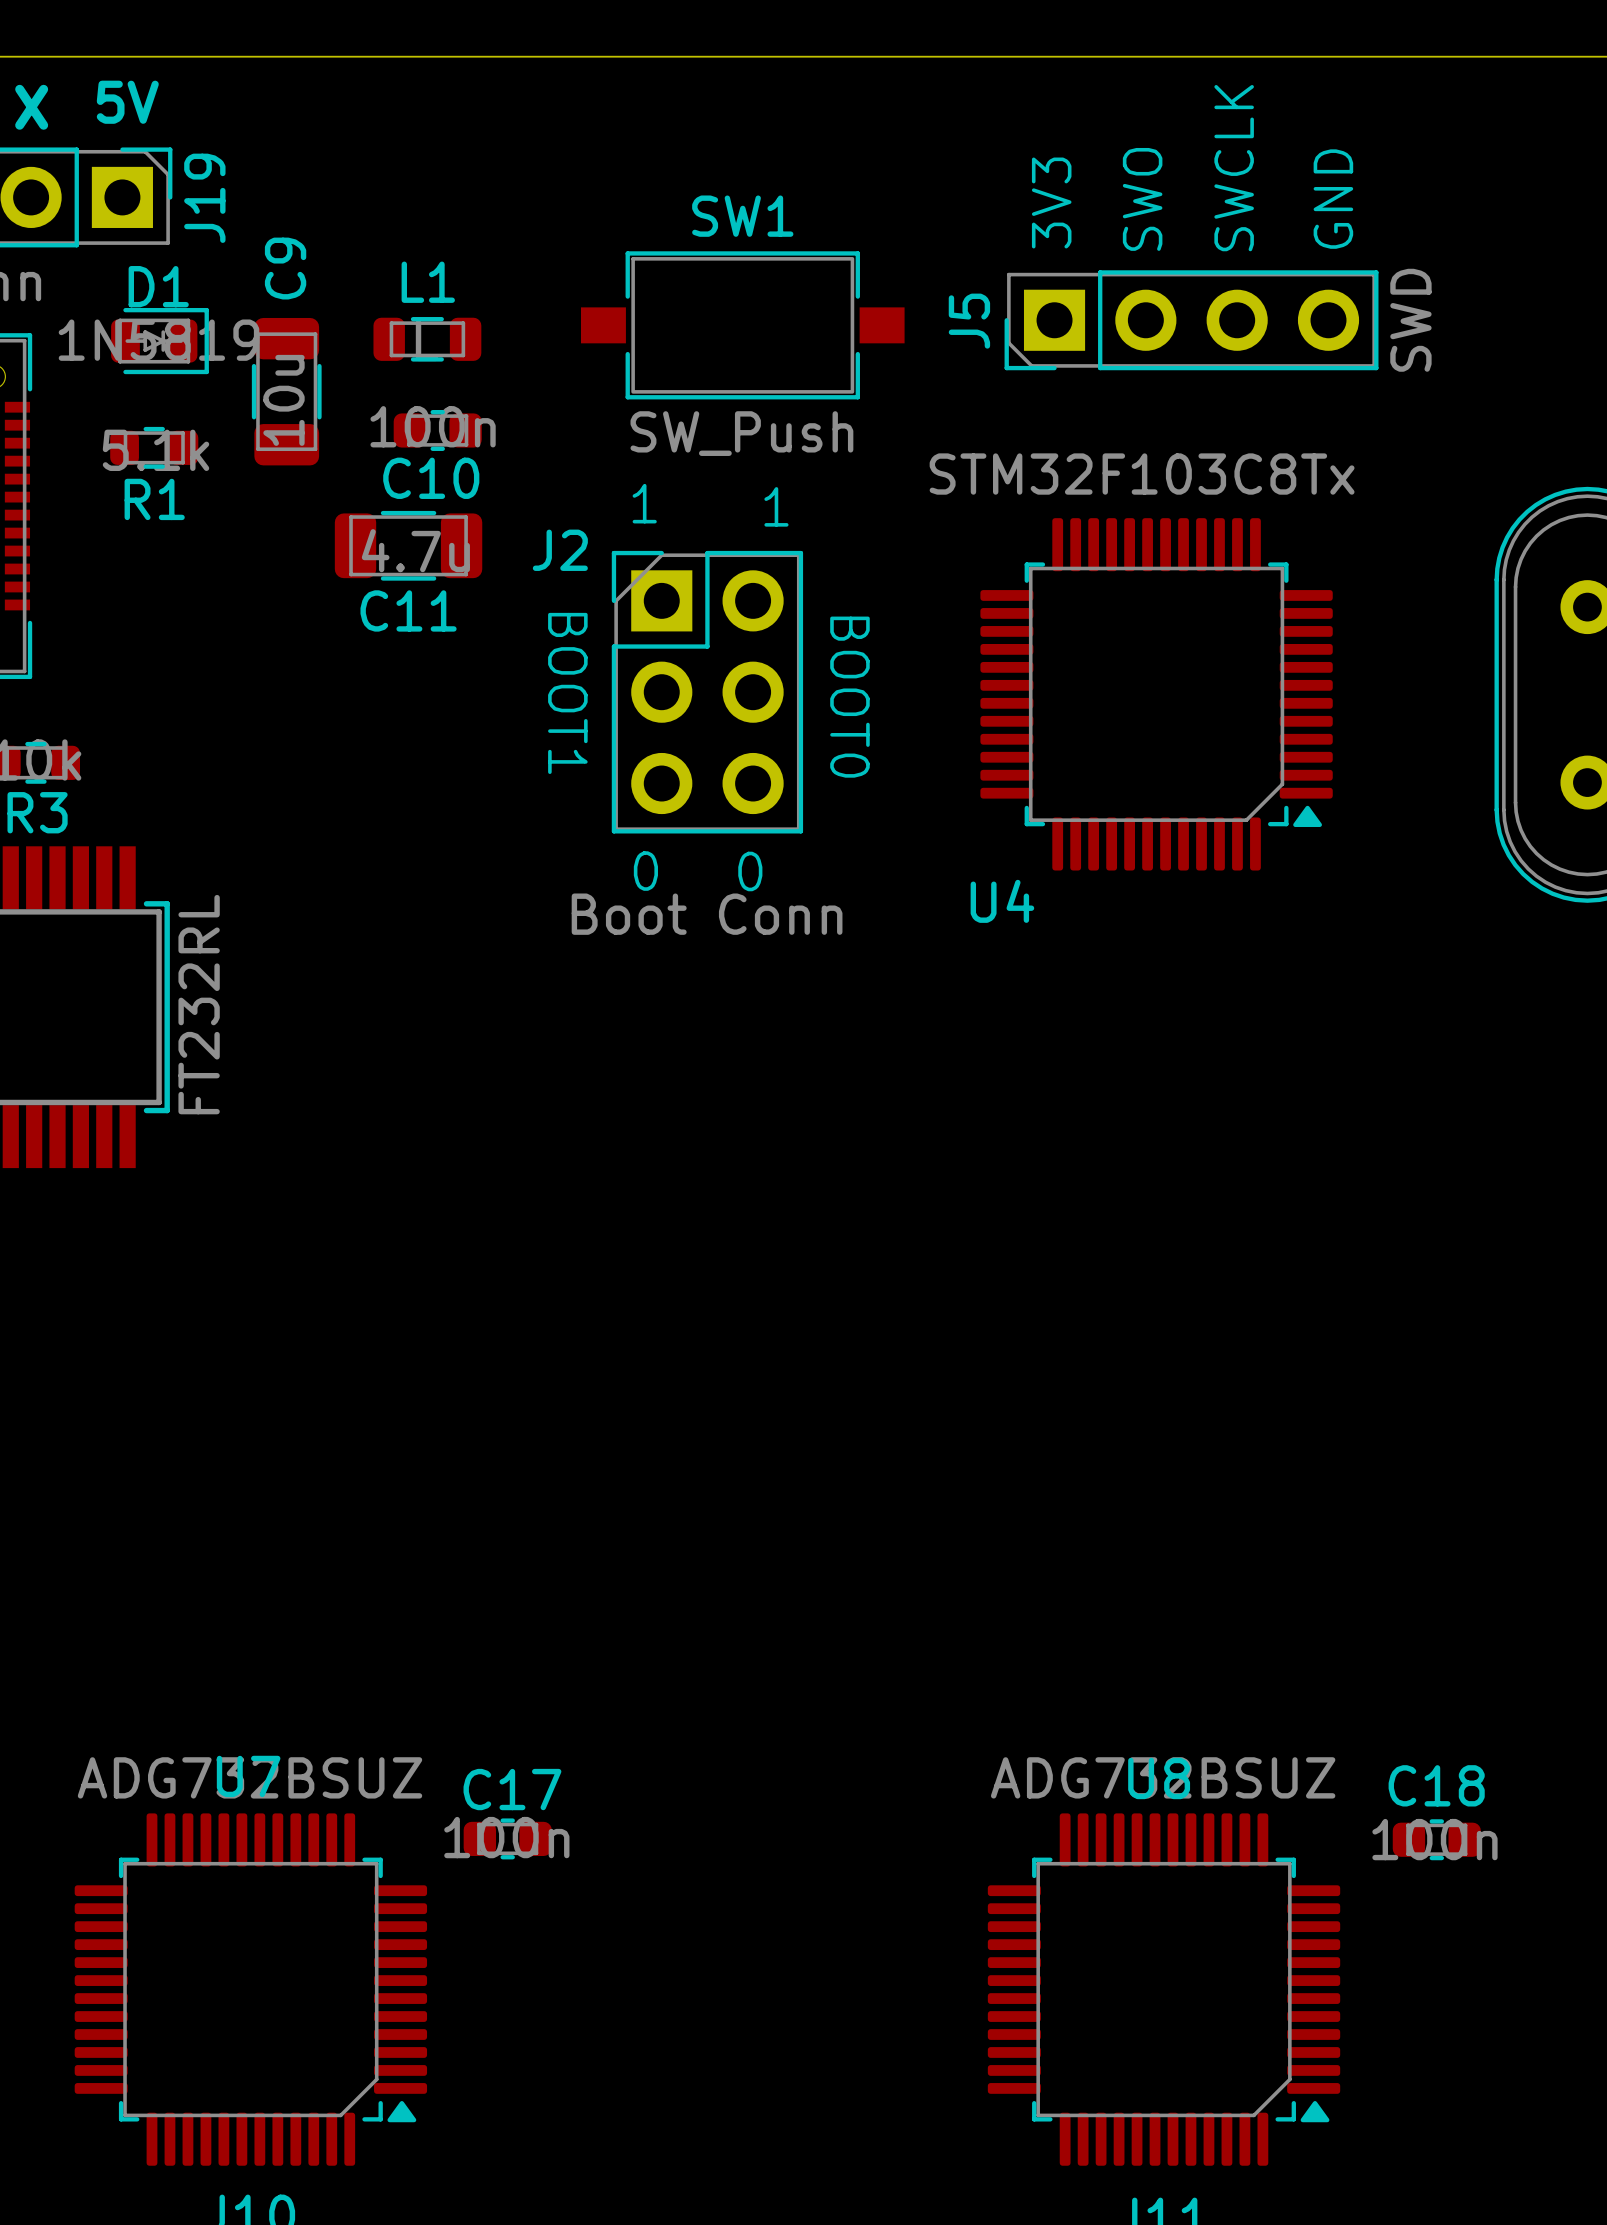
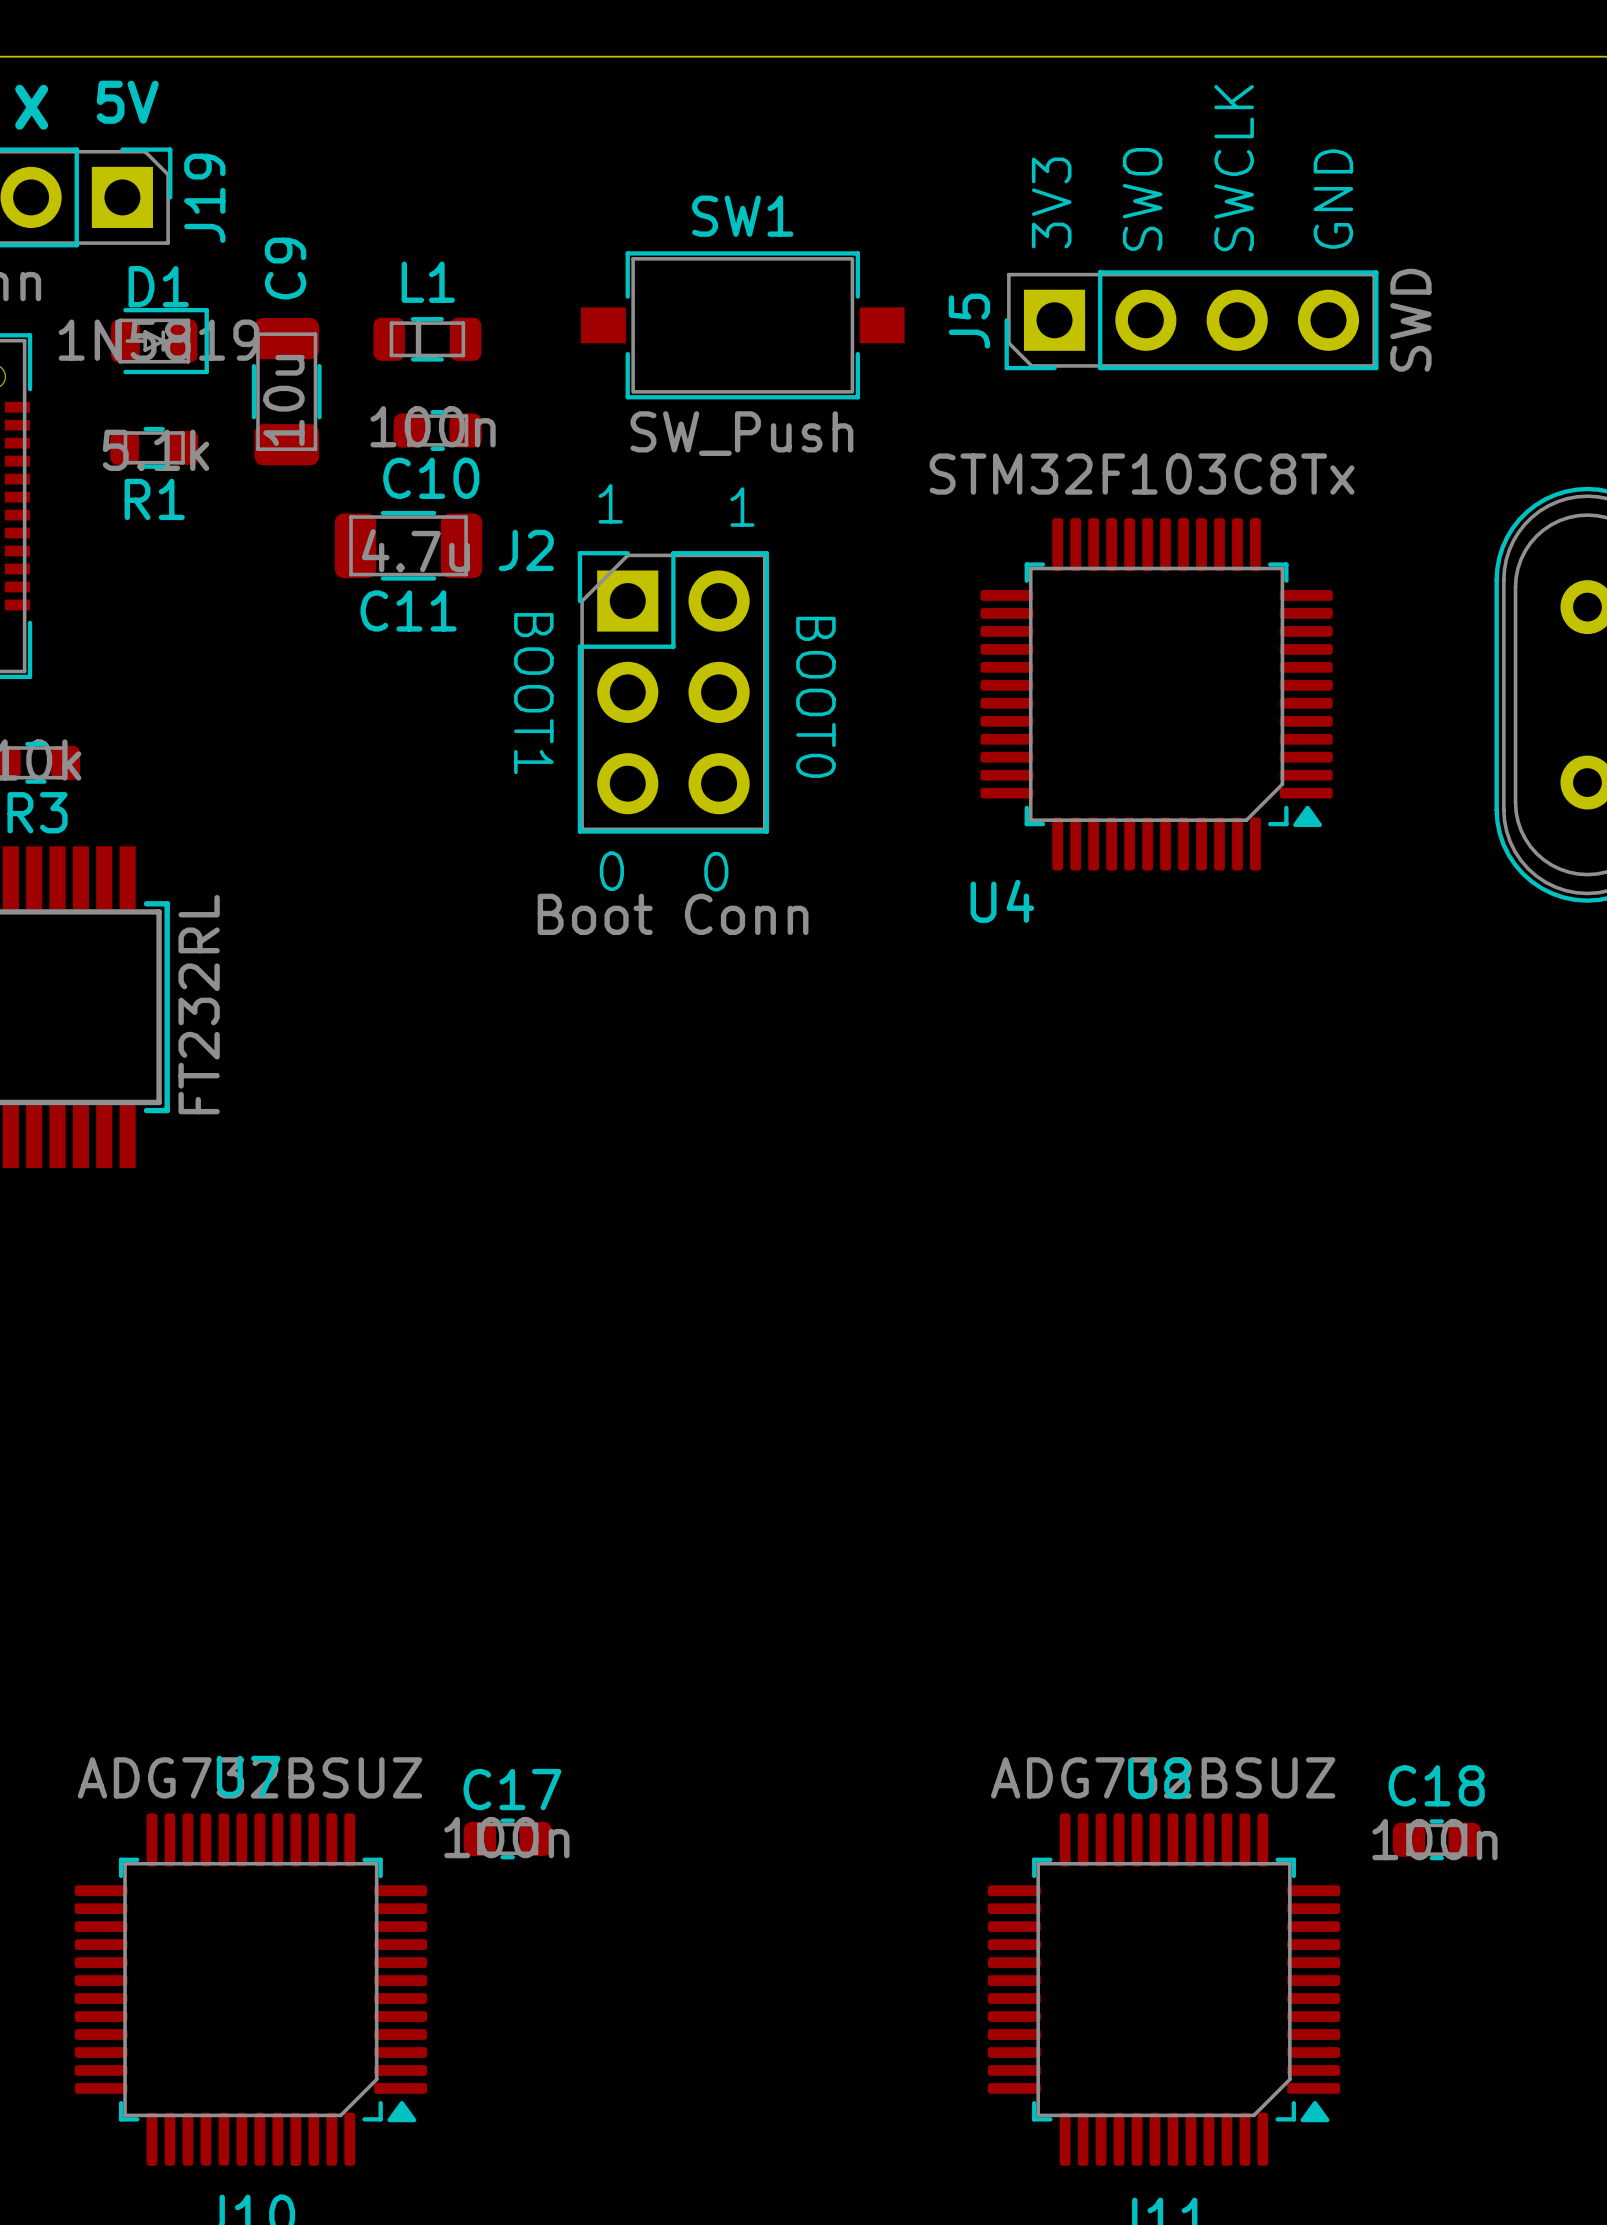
text position: 1 (644, 503) -> 1 (610, 503)
text position: 1 (776, 506) -> 1 (742, 507)
J2 position: (707, 692) -> (673, 692)
text position: BOOT1 (567, 693) -> BOOT1 (533, 693)
text position: BOOT0 (849, 697) -> BOOT0 (815, 697)
text position: 0 (645, 871) -> 0 (611, 871)
text position: 0 (750, 871) -> 0 (716, 871)

